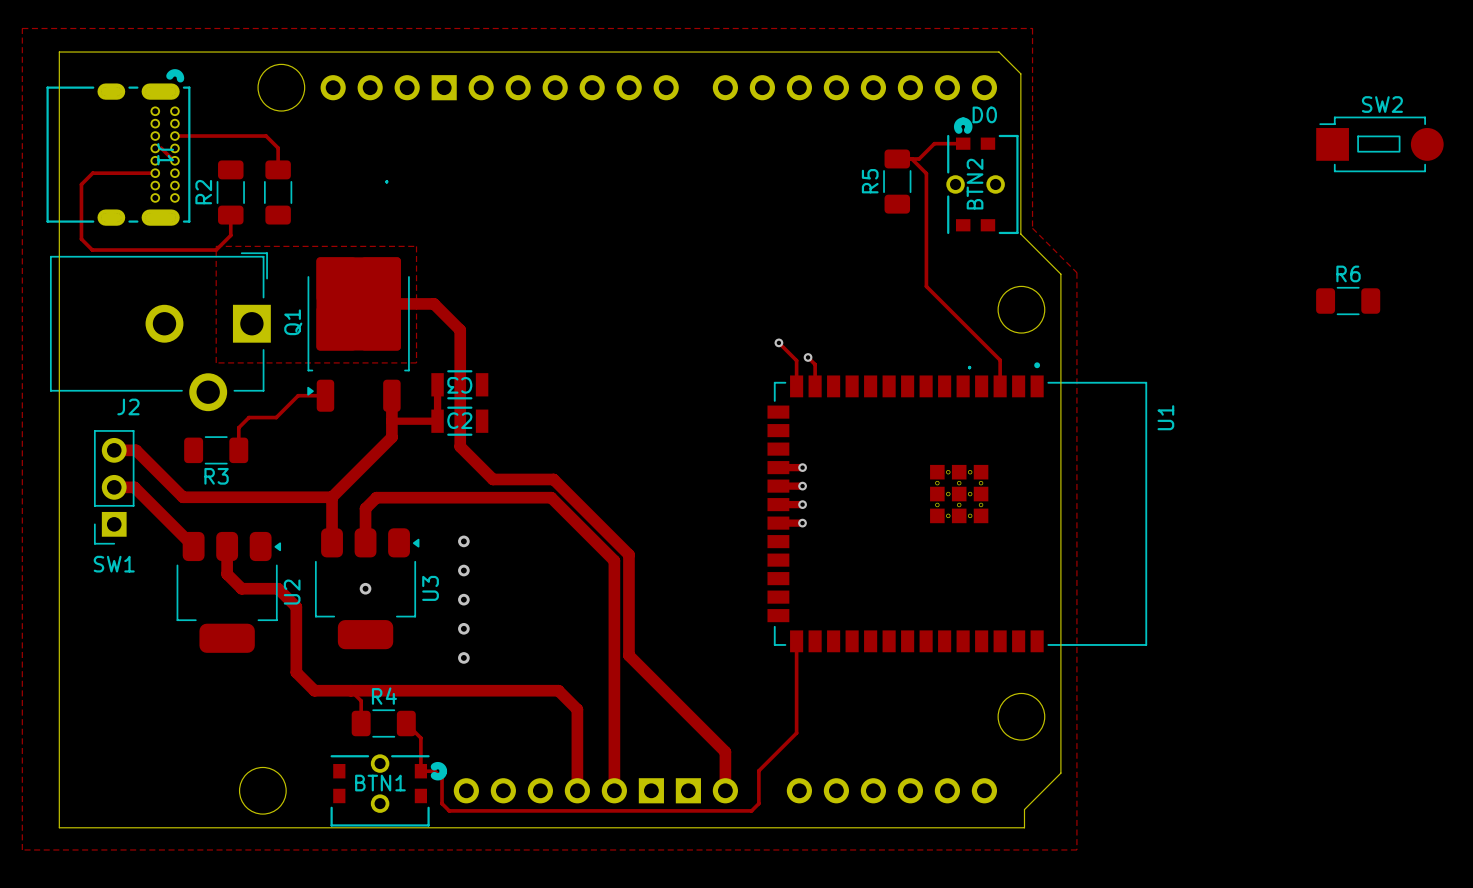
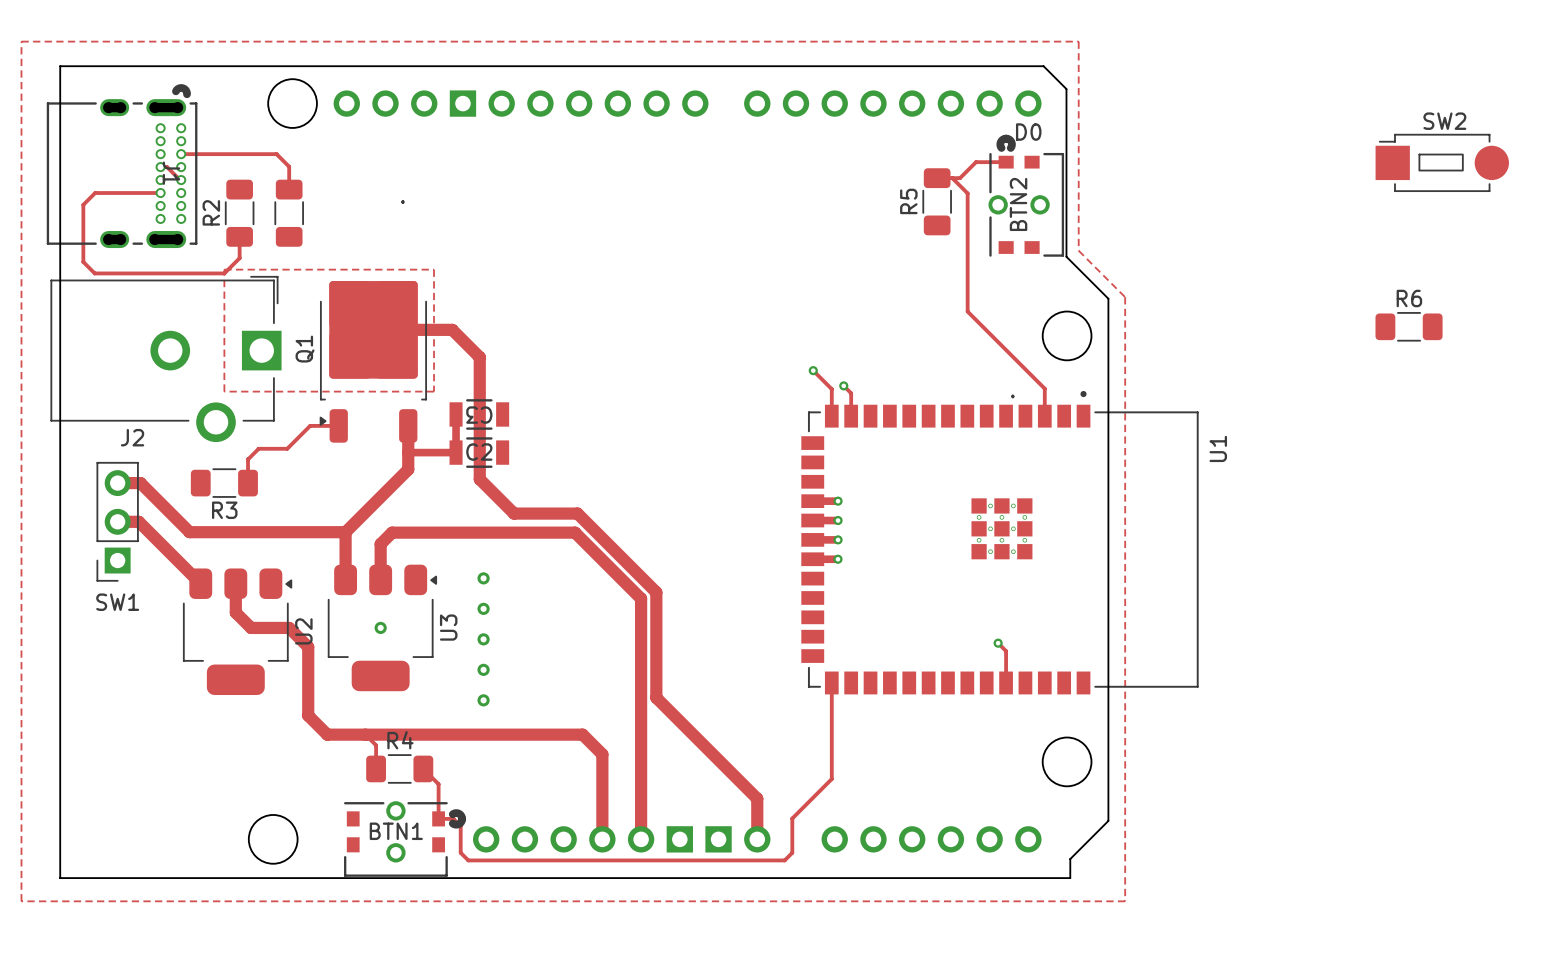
track: none -> (998, 643) (1006, 651) (1006, 682)
via: none -> (998, 643)

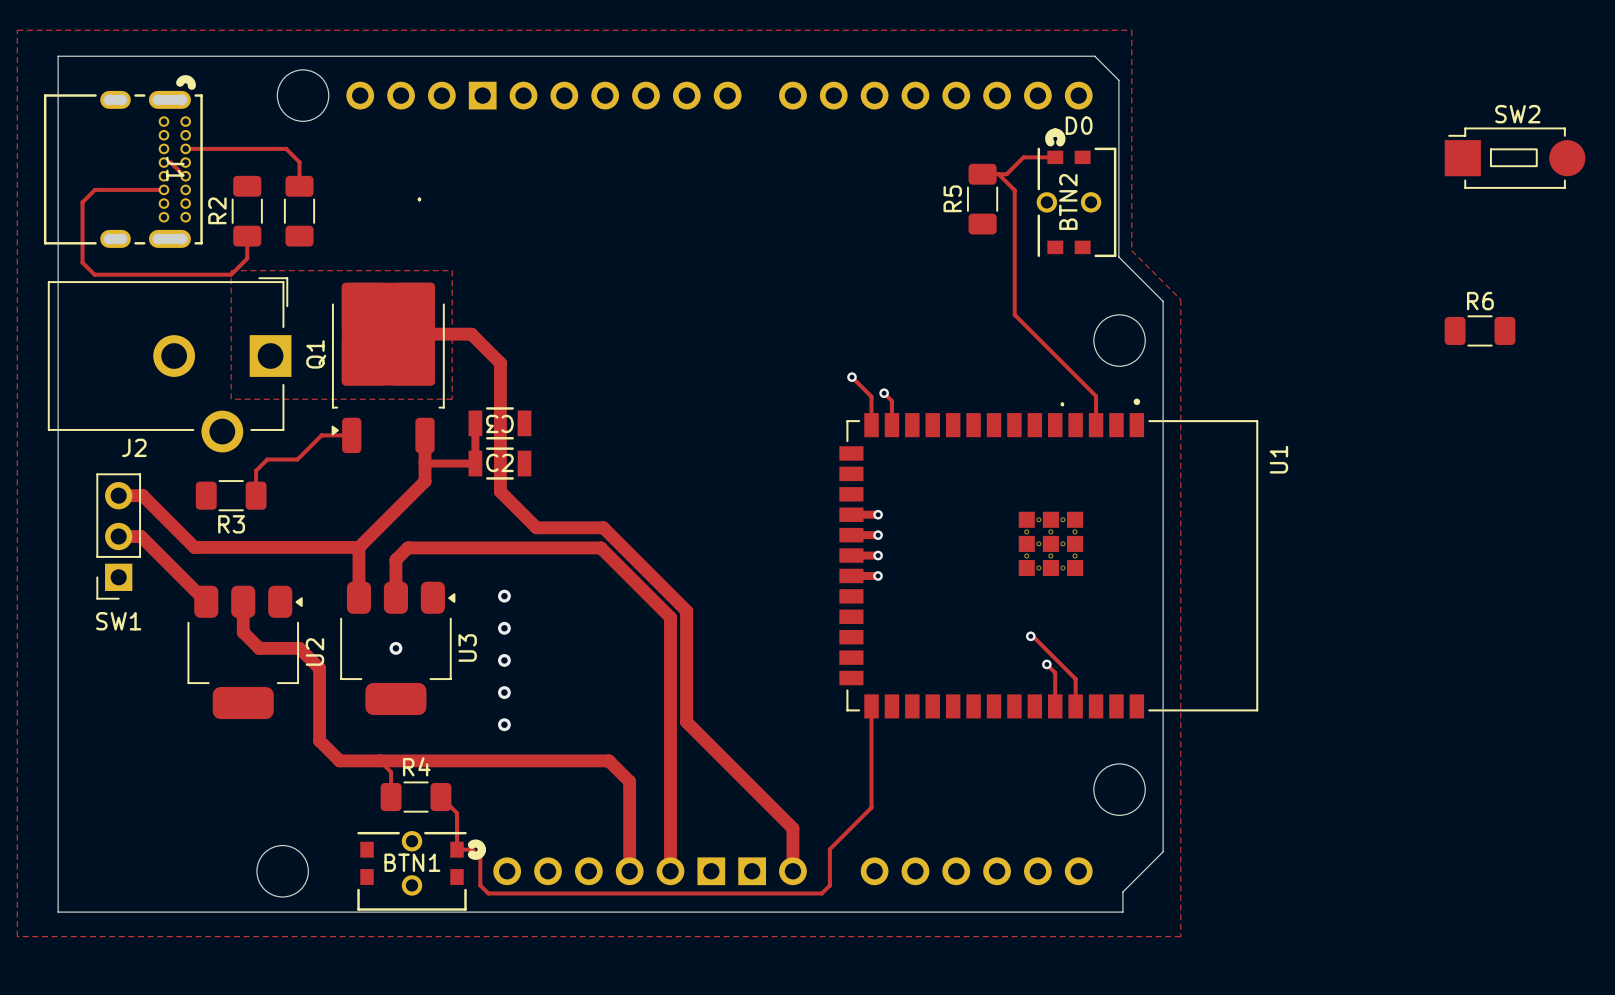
track: none -> (1030, 636) (1075, 679) (1075, 706)
via: none -> (1030, 636)

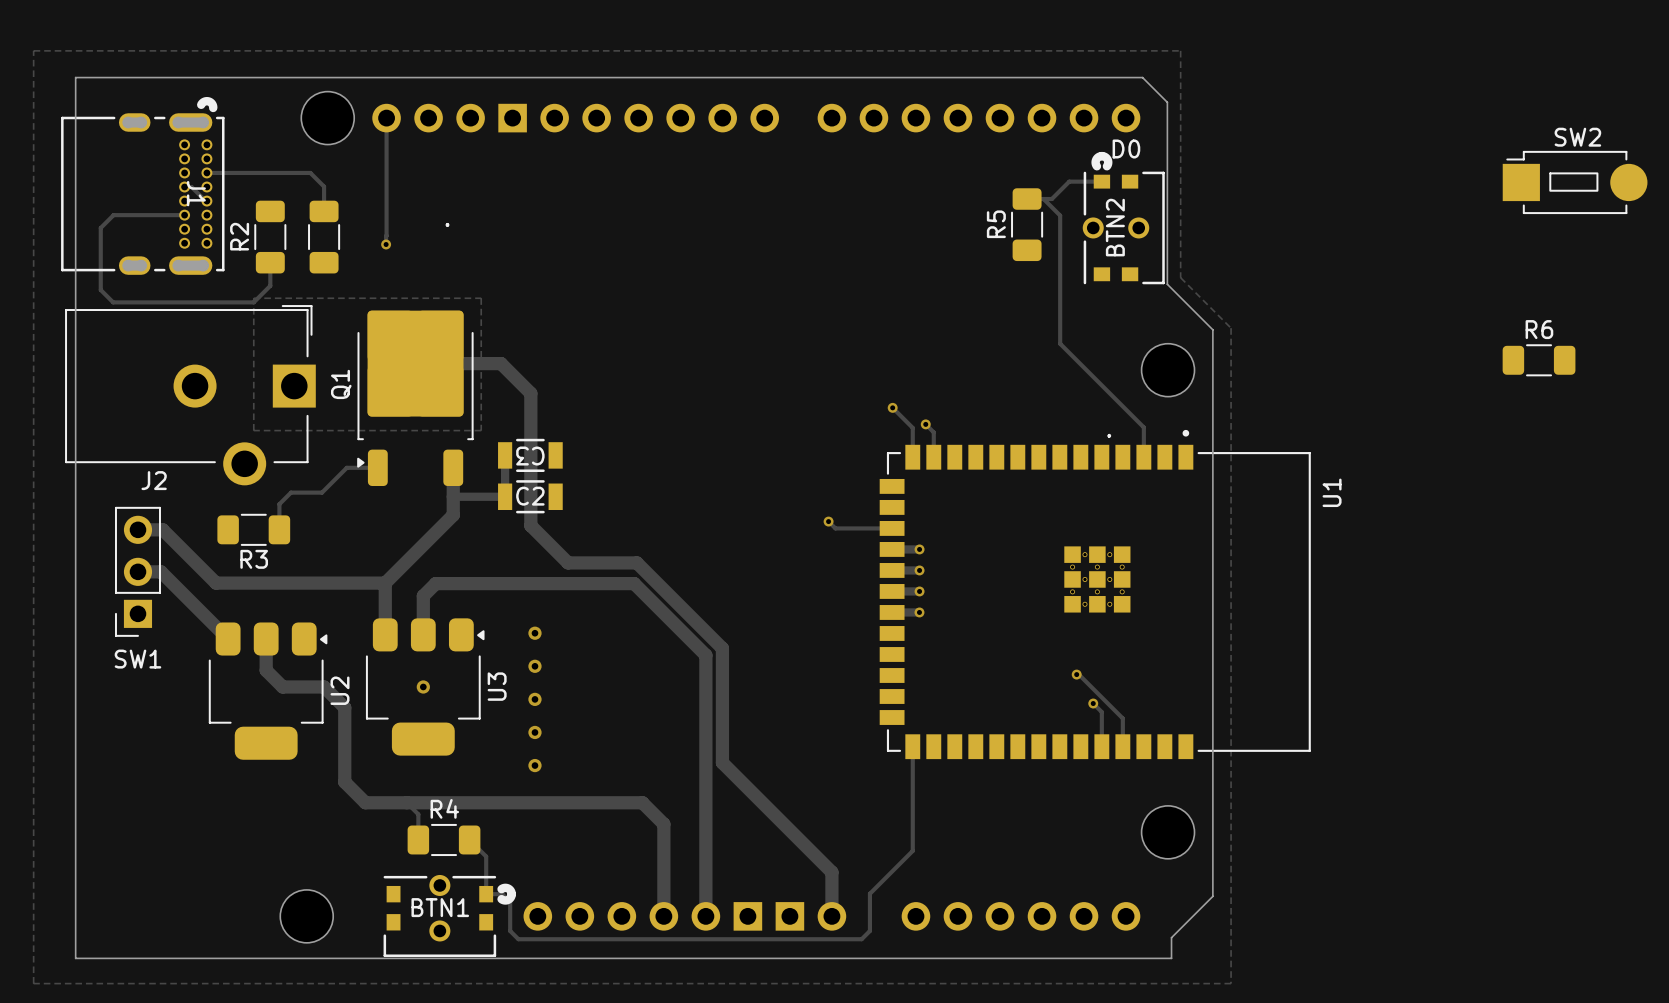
track: none -> (386, 118) (386, 244)
via: none -> (386, 244)
track: none -> (828, 521) (835, 528) (892, 528)
via: none -> (828, 521)

